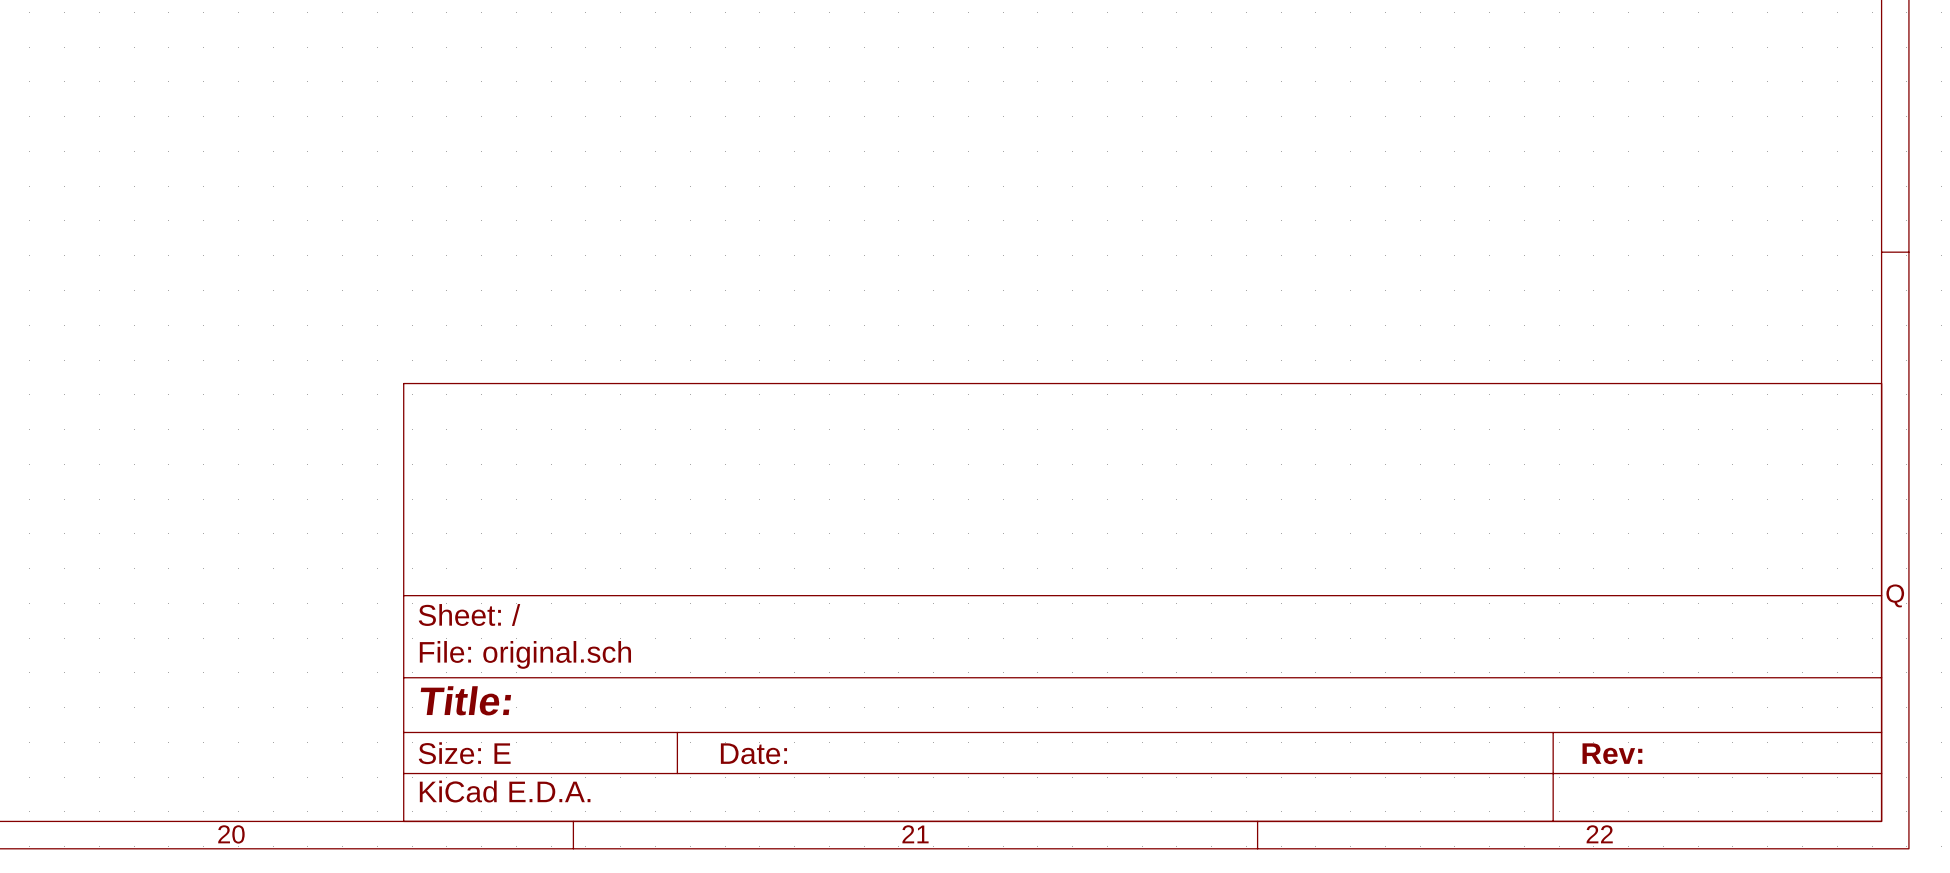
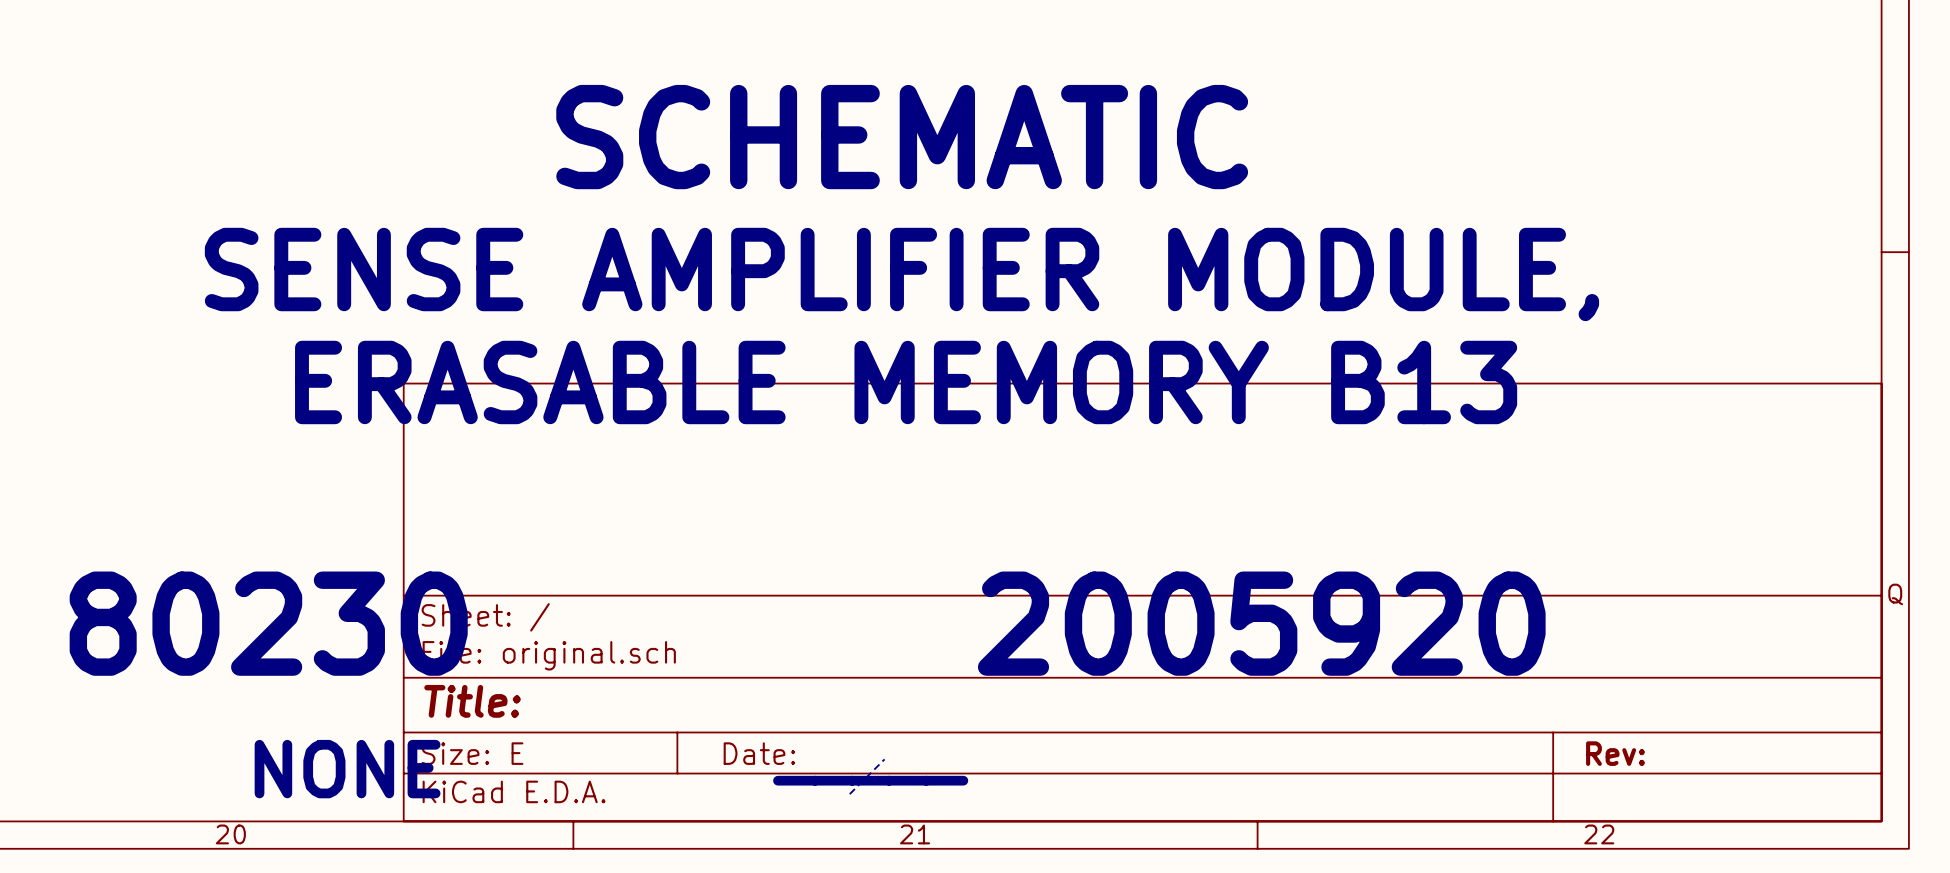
text: none -> SCHEMATIC (902, 137)
text: none -> SENSE AMPLIFIER MODULE, (901, 274)
text: none -> ERASABLE MEMORY B13 (906, 382)
text: none -> 80230 (268, 623)
text: none -> 2005920 (1261, 623)
line: none -> (884, 759) (849, 794)
text: none -> NONE (347, 769)
text: none -> _____ (870, 780)

